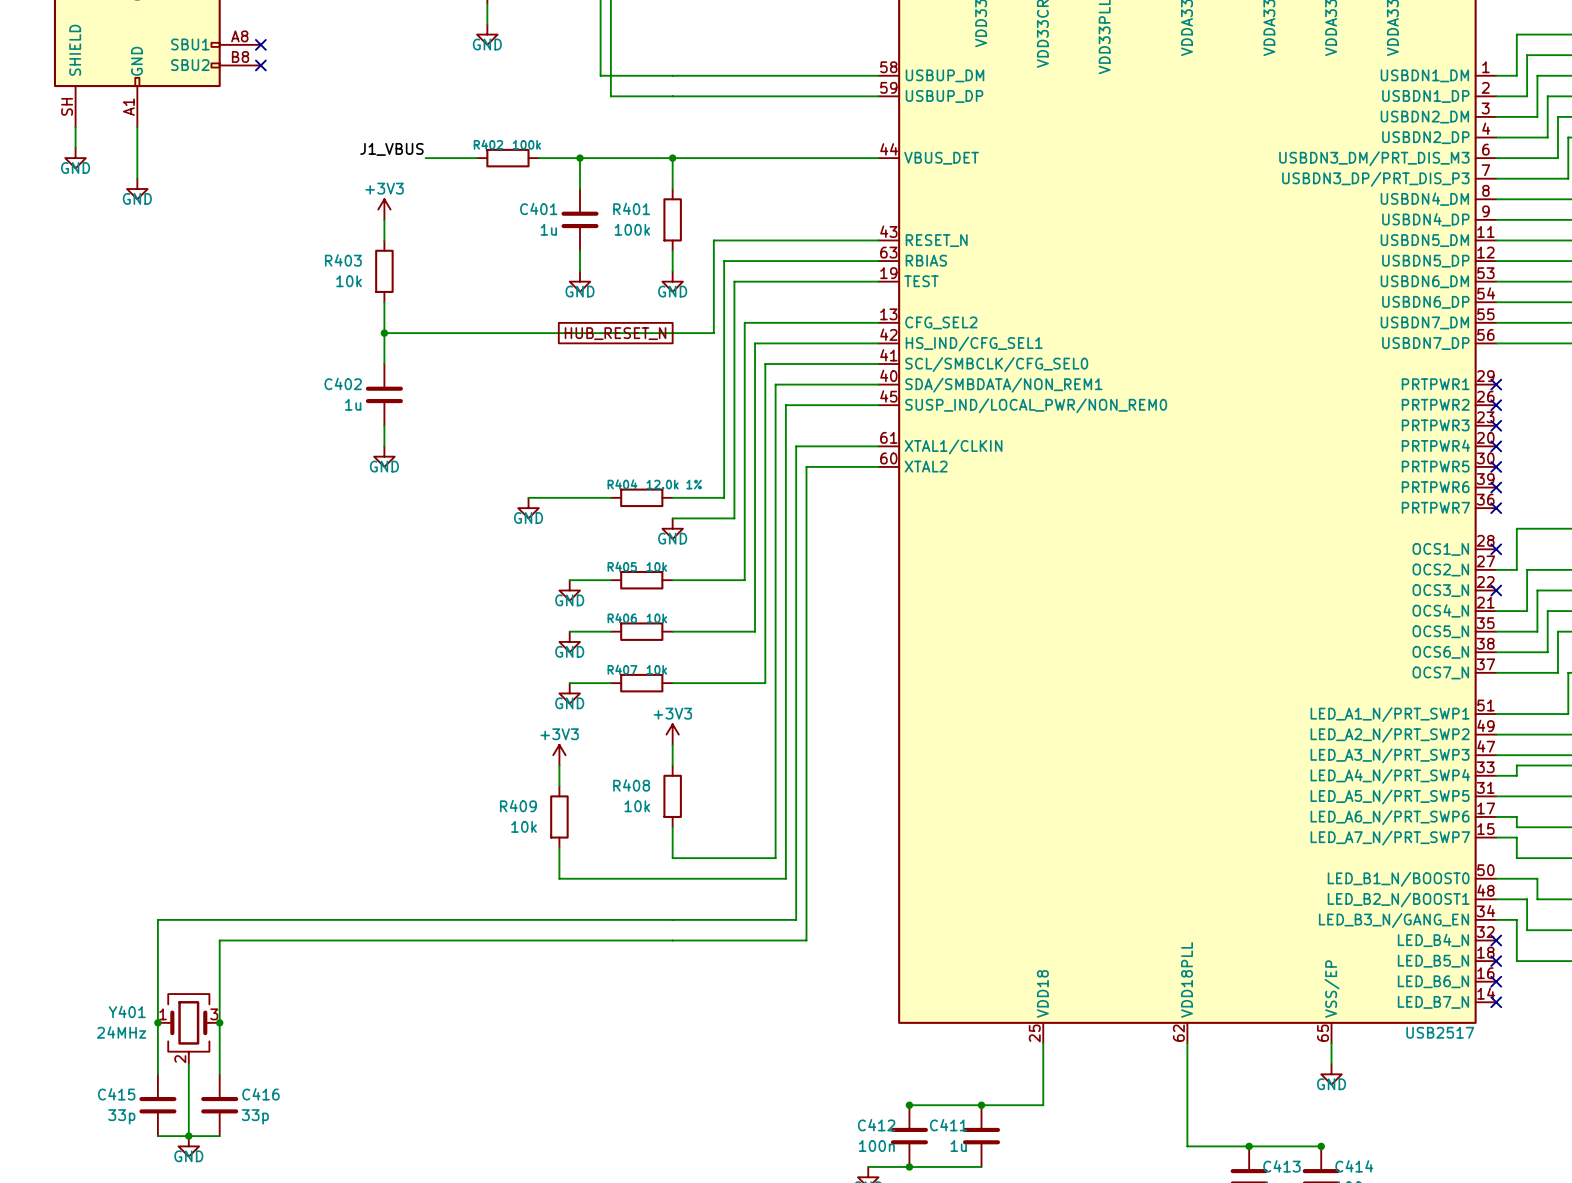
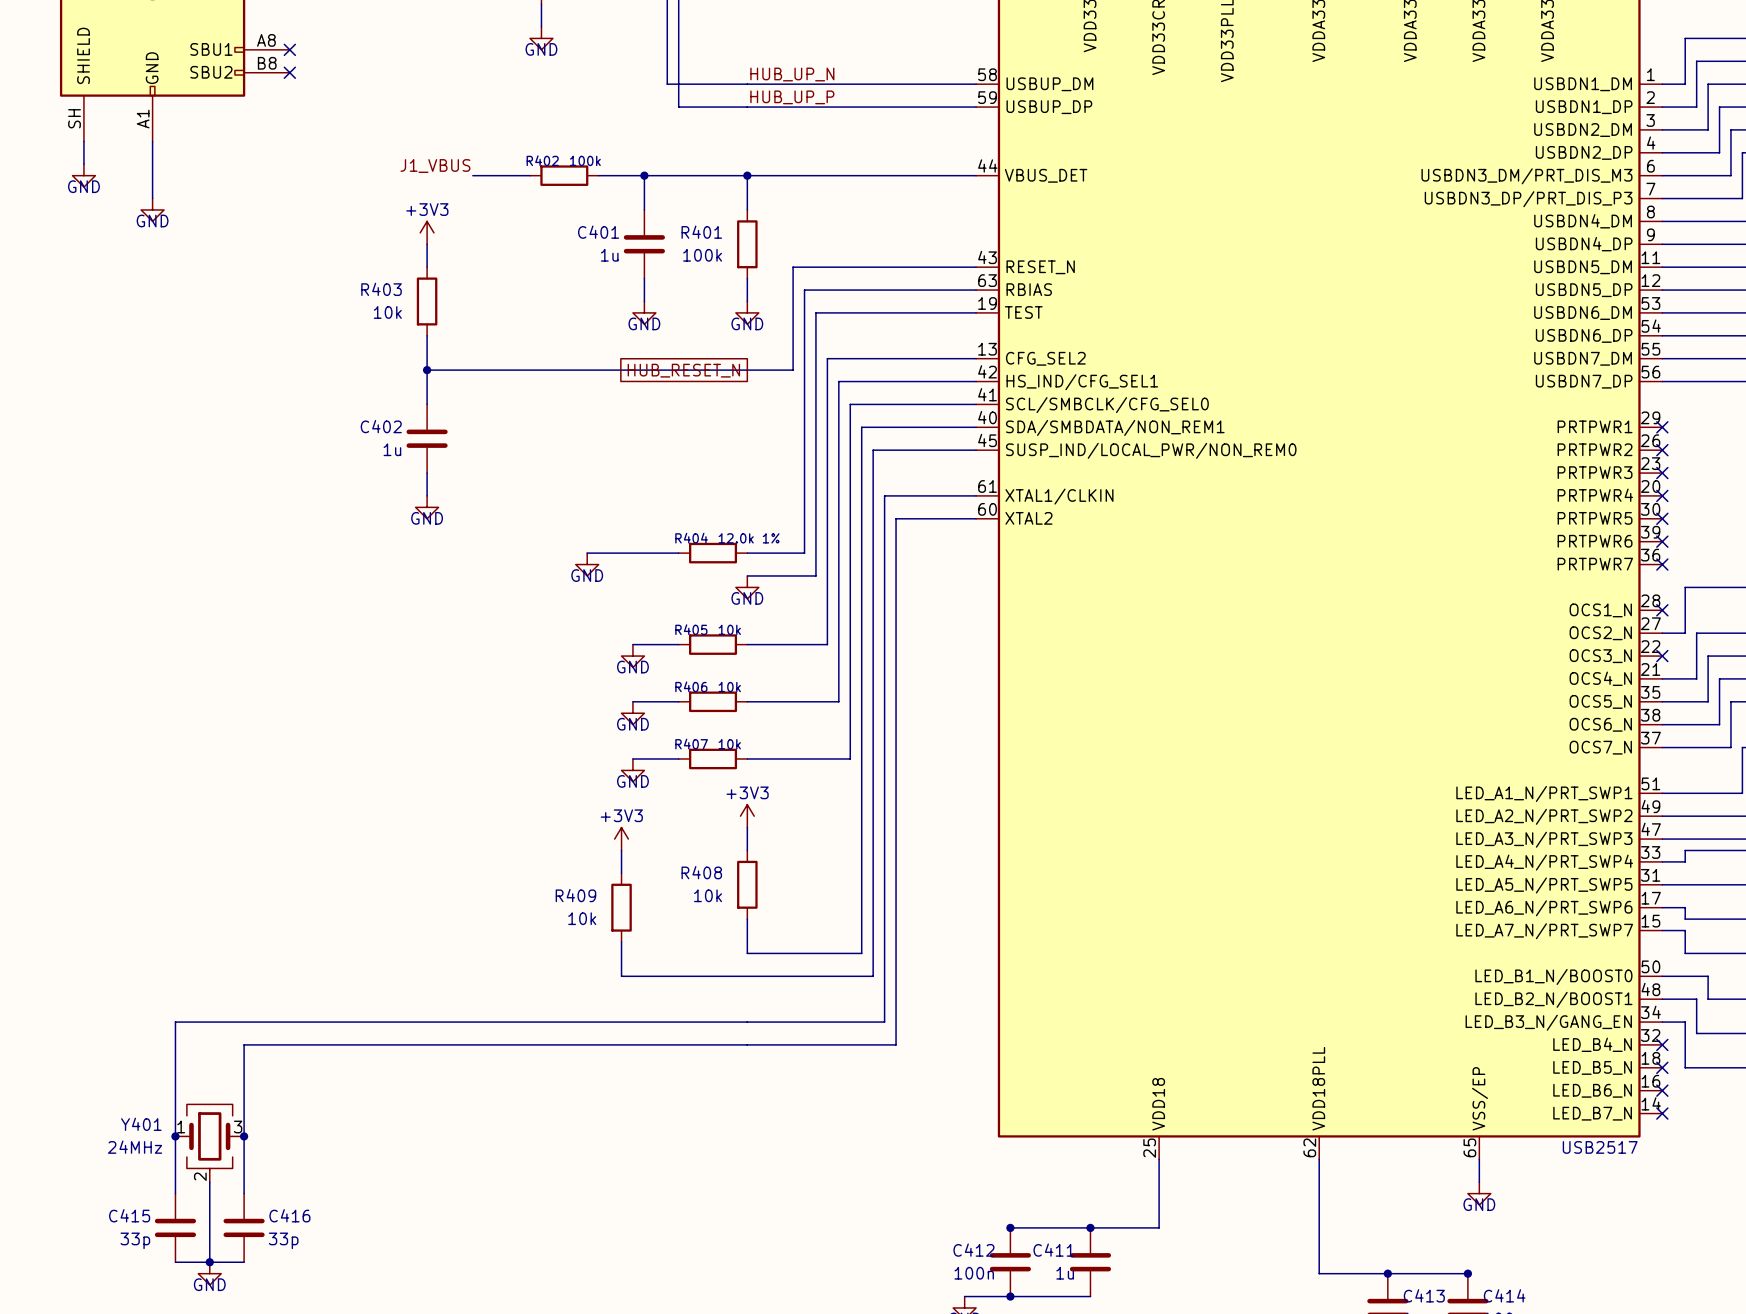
label: none -> HUB_UP_N (792, 74)
label: none -> HUB_UP_P (792, 97)

